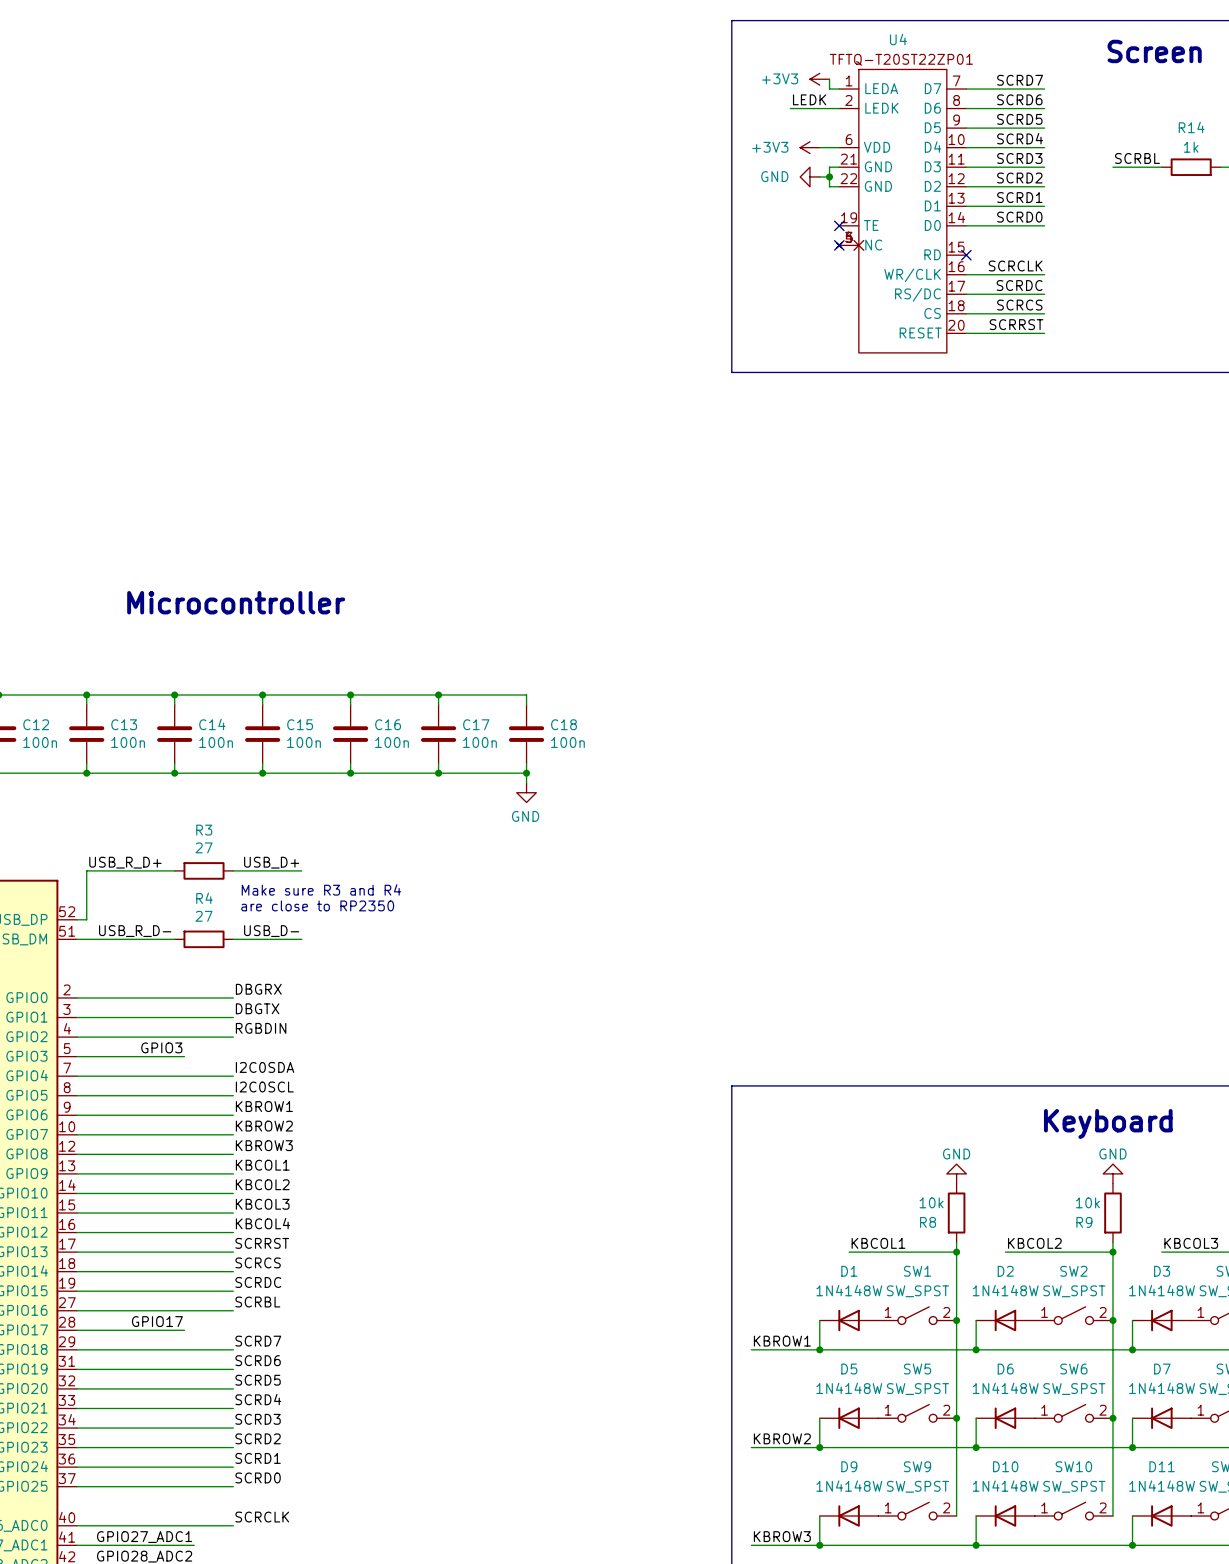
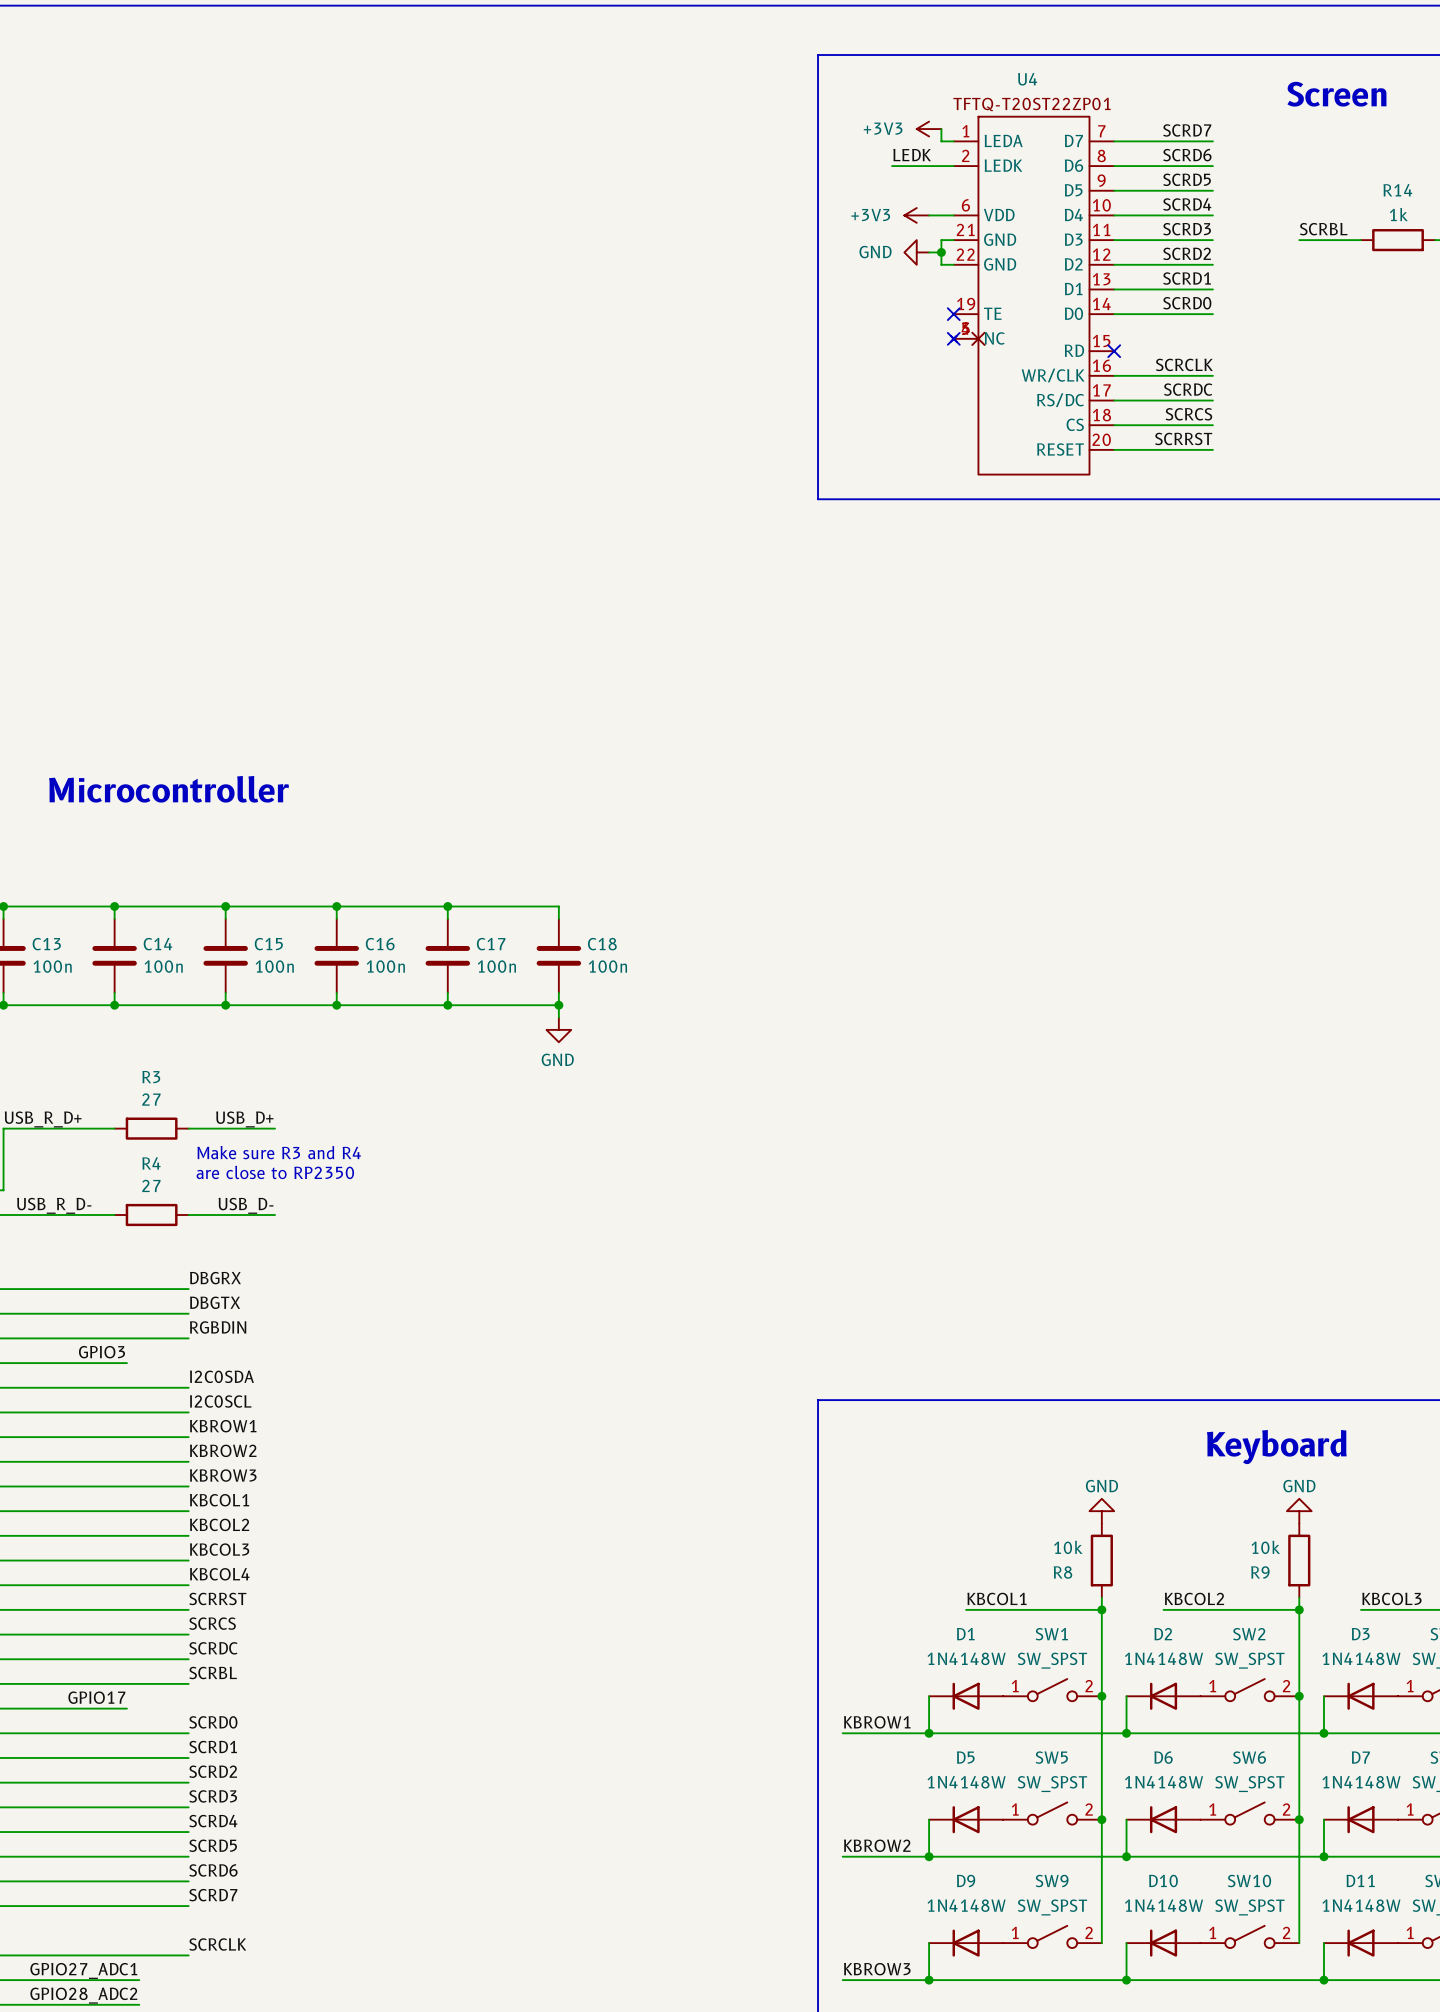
label: SCRD7 (258, 1341) -> SCRD0 (213, 1722)
label: SCRD6 (258, 1360) -> SCRD1 (213, 1747)
label: SCRD5 (258, 1380) -> SCRD2 (213, 1771)
label: SCRD4 (258, 1399) -> SCRD3 (213, 1796)
label: SCRD3 (258, 1419) -> SCRD4 (213, 1821)
label: SCRD2 (258, 1438) -> SCRD5 (213, 1845)
label: SCRD1 (258, 1458) -> SCRD6 (213, 1870)
label: SCRD0 (258, 1477) -> SCRD7 (213, 1895)

